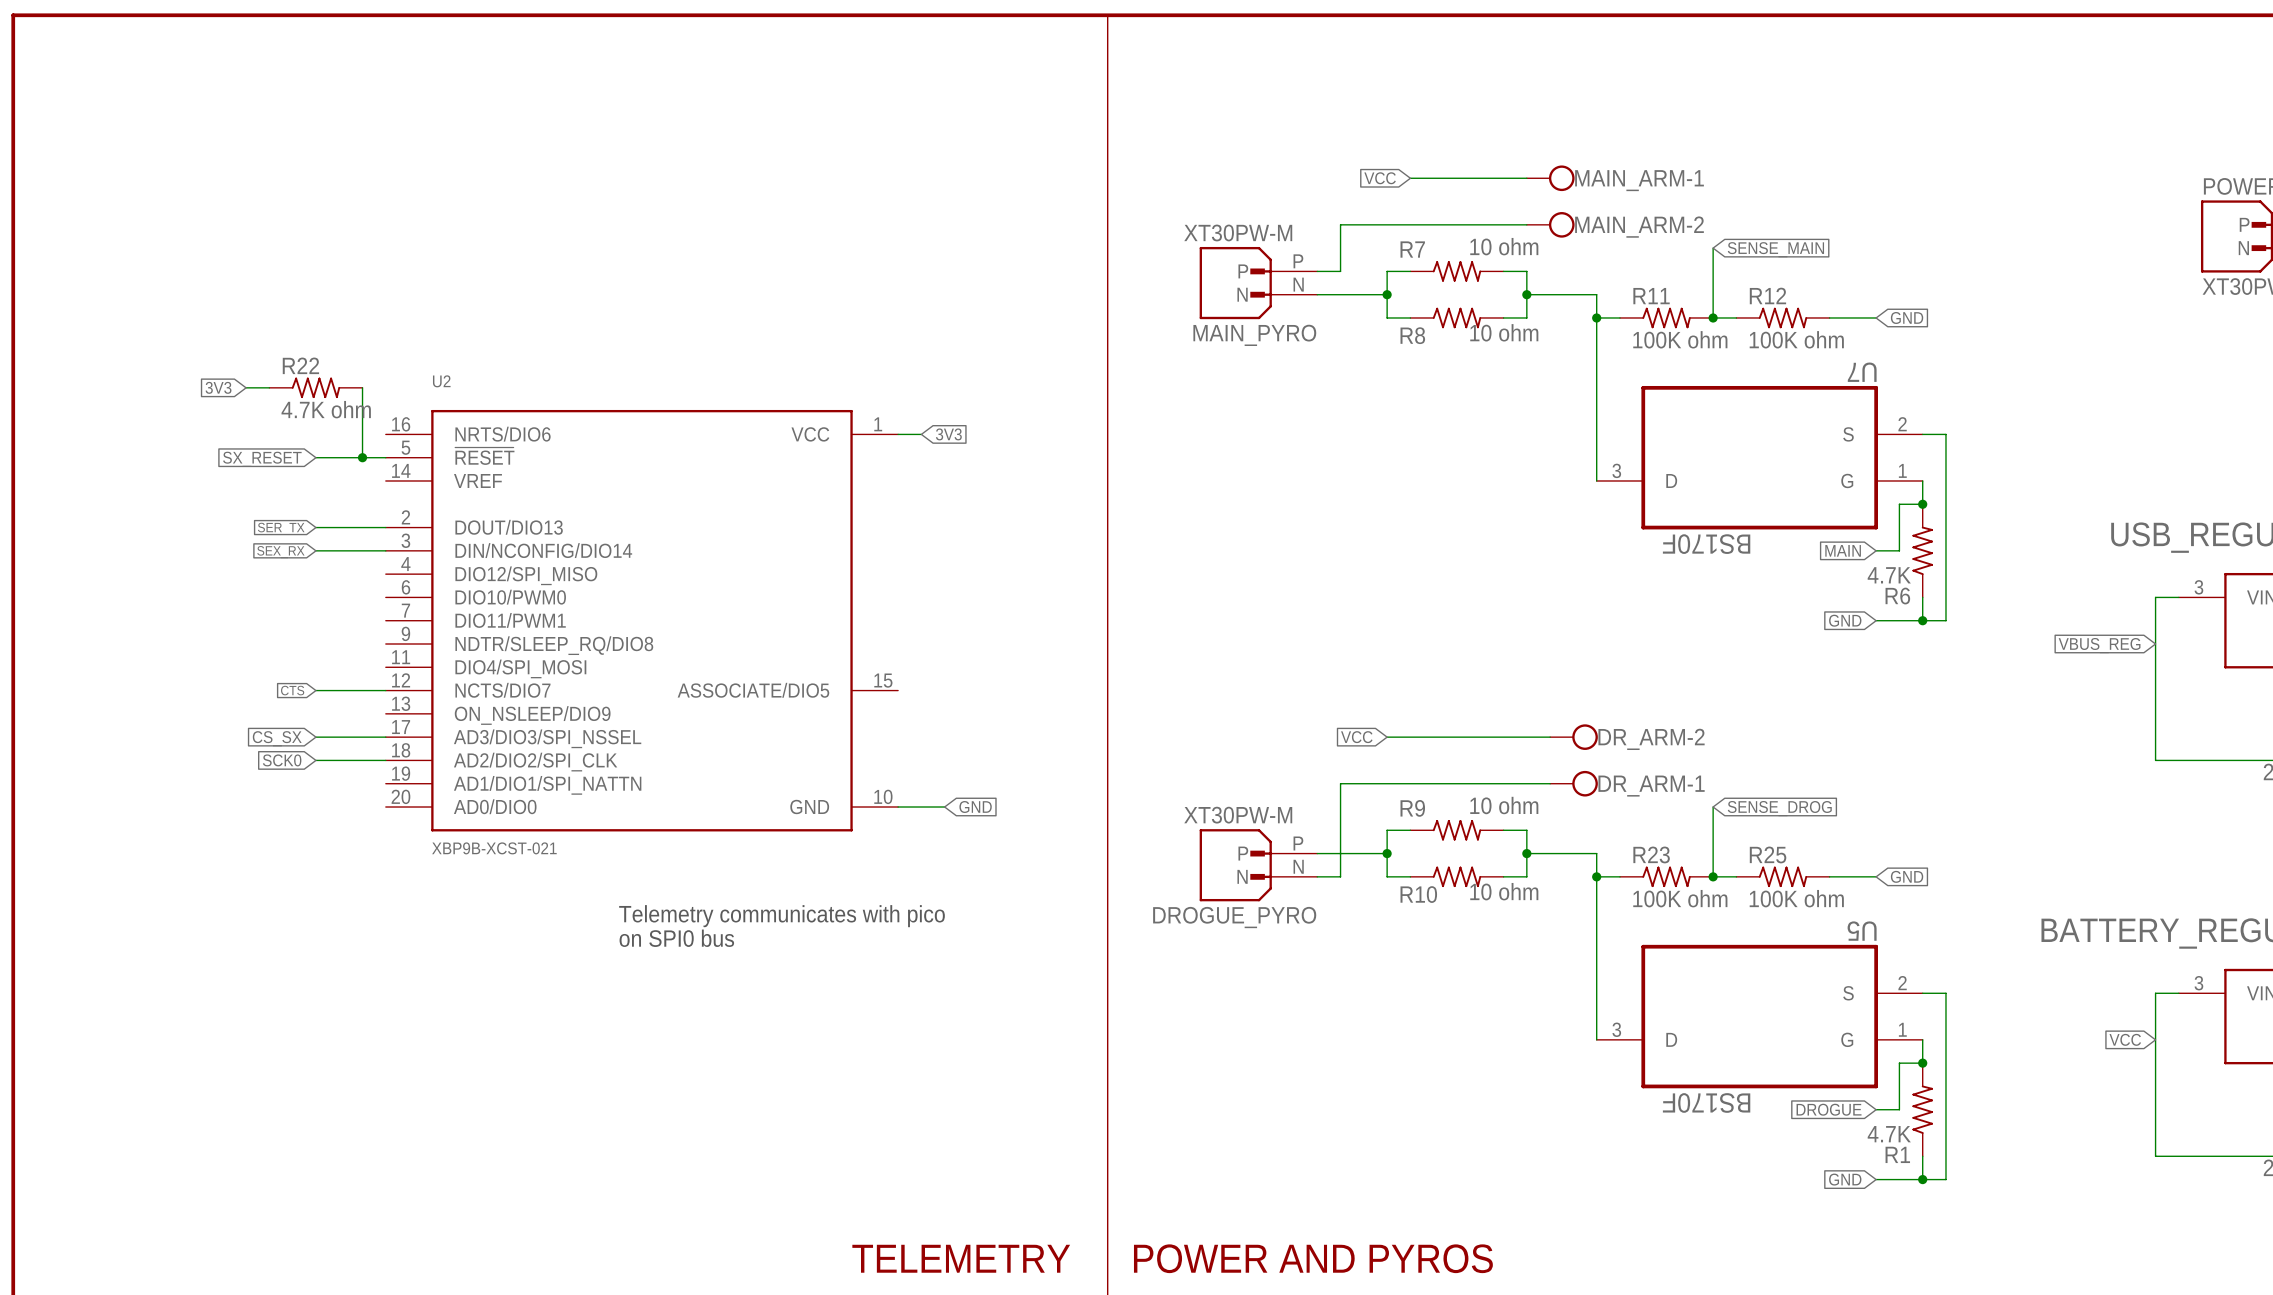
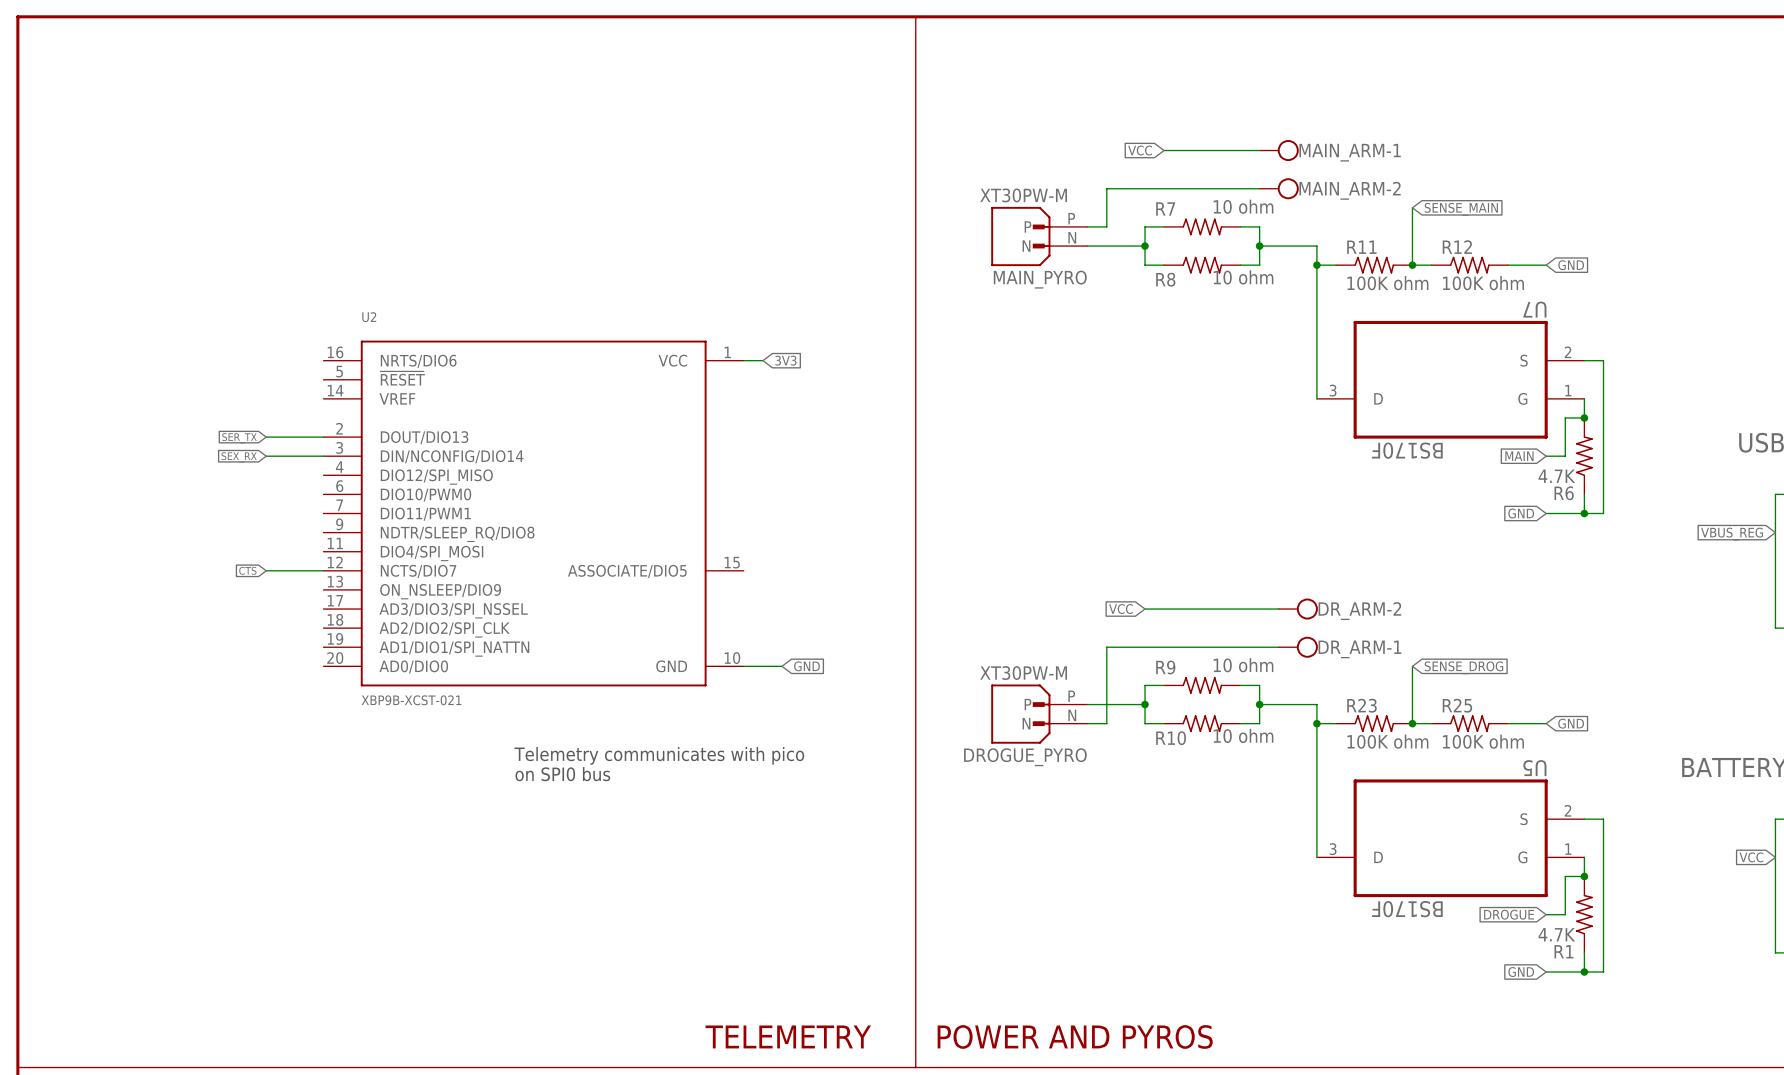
global label: 3V3 (218, 387) -> none
wire: (246, 387) (269, 387) -> none
R22: 4.7K ohm (315, 387) -> none
wire: (362, 387) (362, 457) -> none
wire: (315, 457) (385, 457) -> none
junction: (362, 457) -> none
global label: SX_RESET (262, 459) -> none
wire: (315, 737) (385, 737) -> none
global label: CS_SX (277, 738) -> none
global label: SCK0 (282, 760) -> none
wire: (315, 760) (385, 760) -> none

